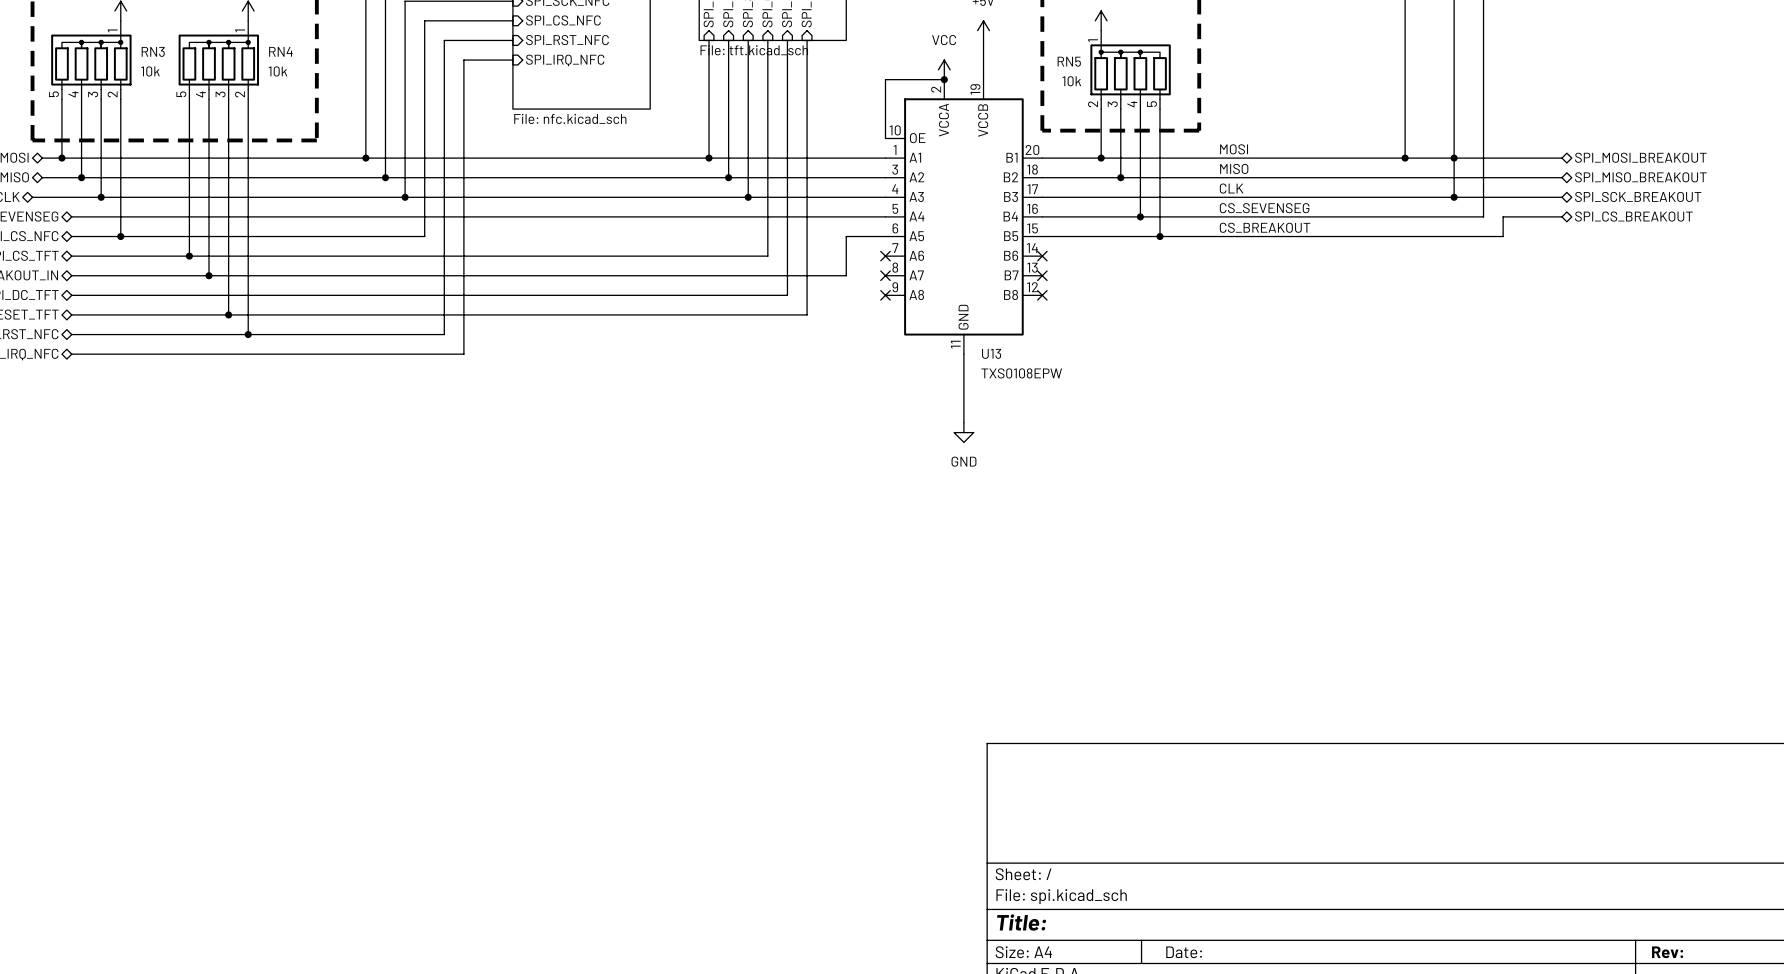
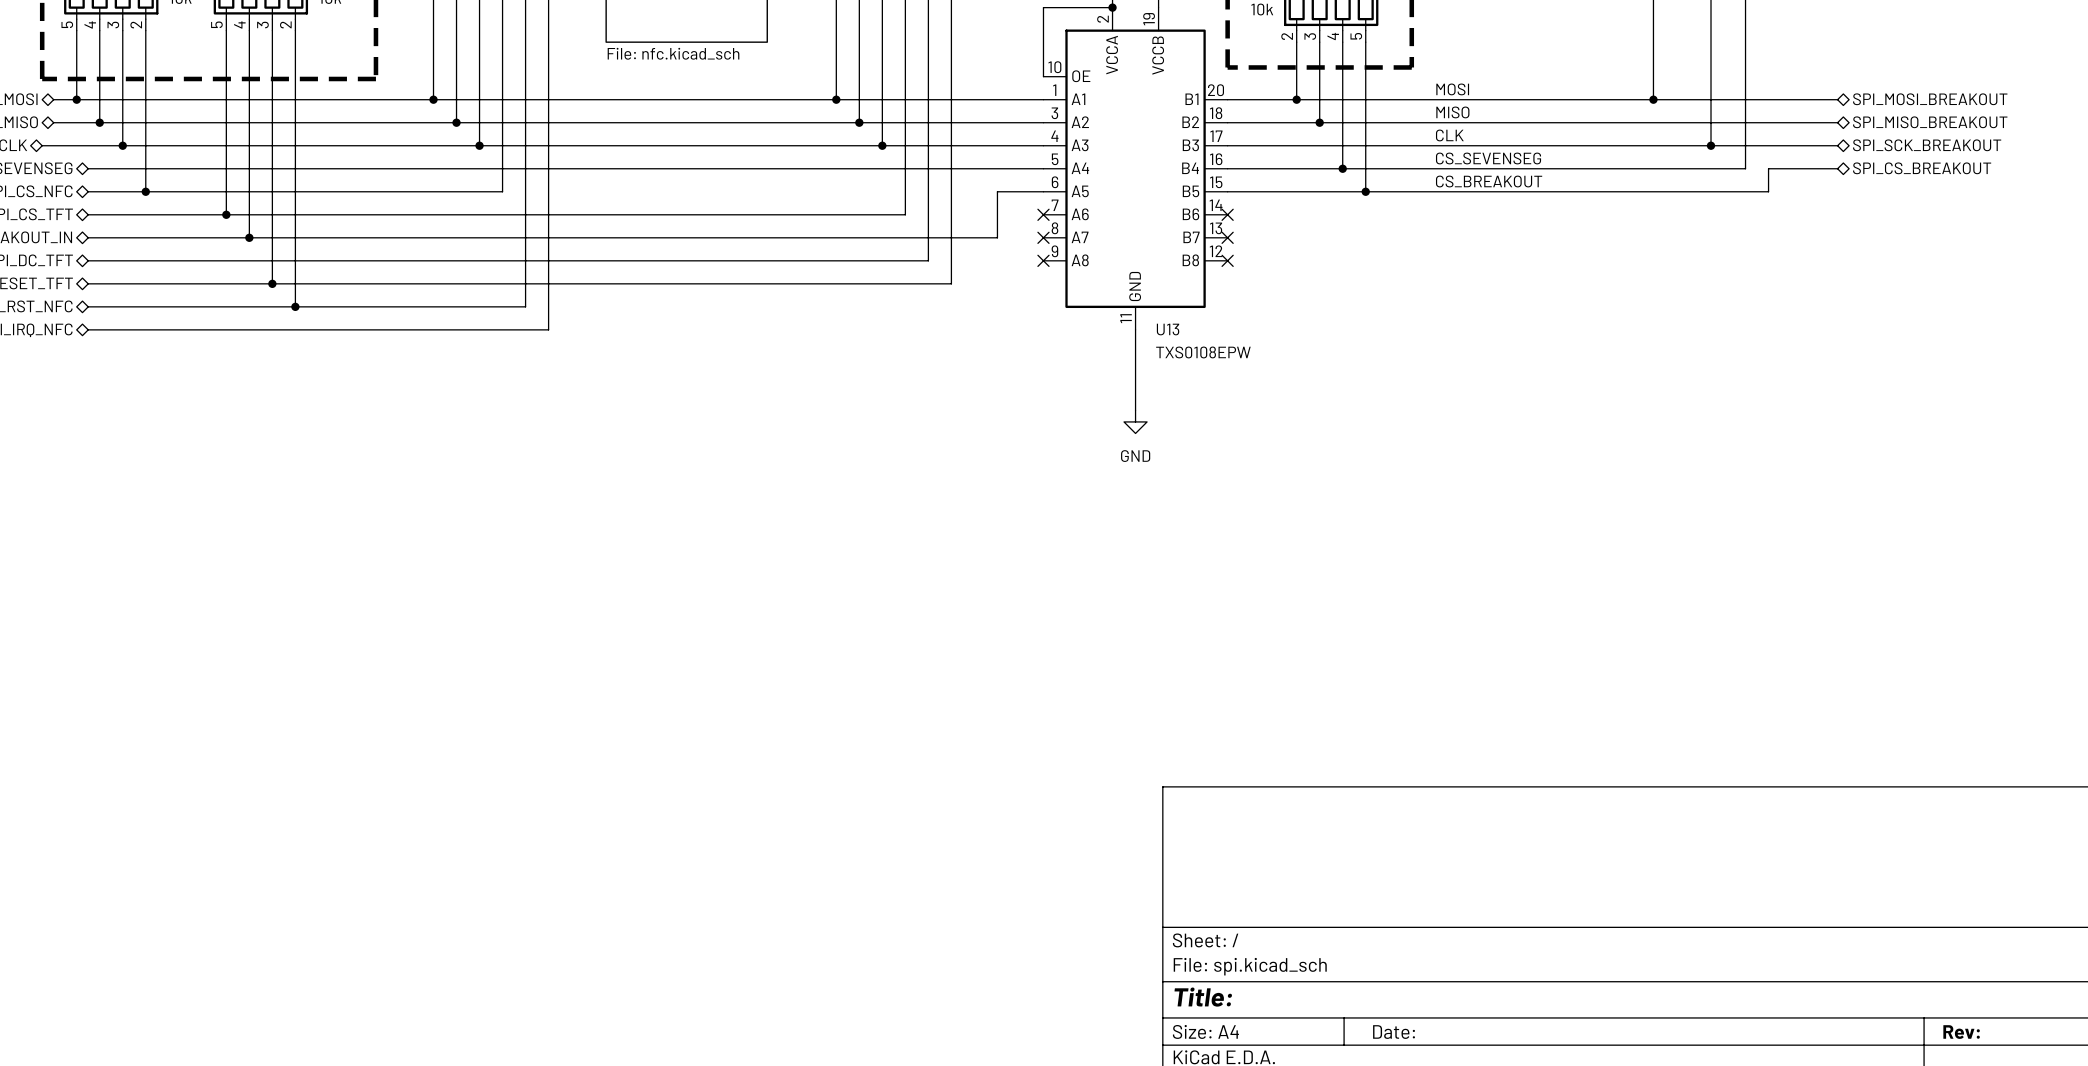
junction: (1454, 158) -> none

